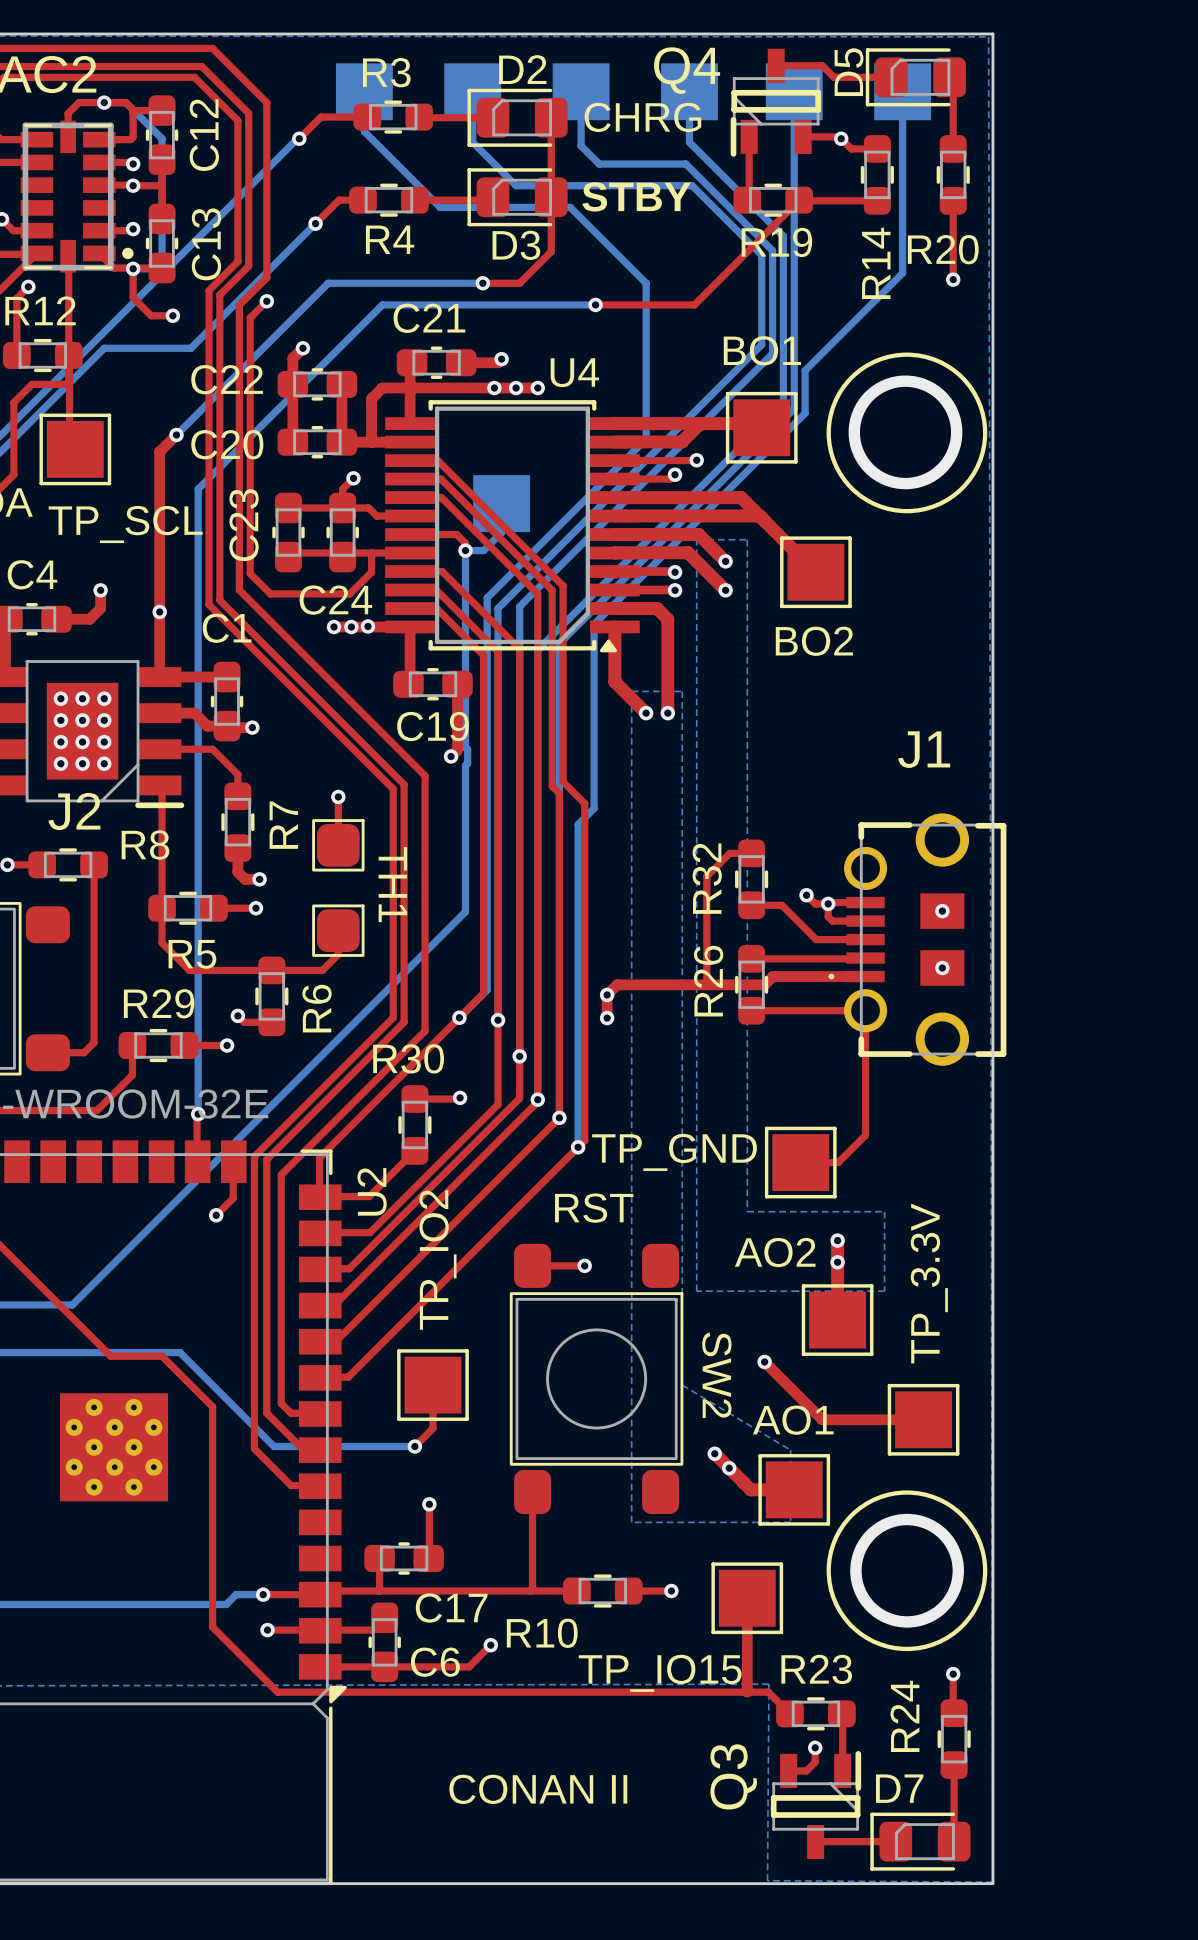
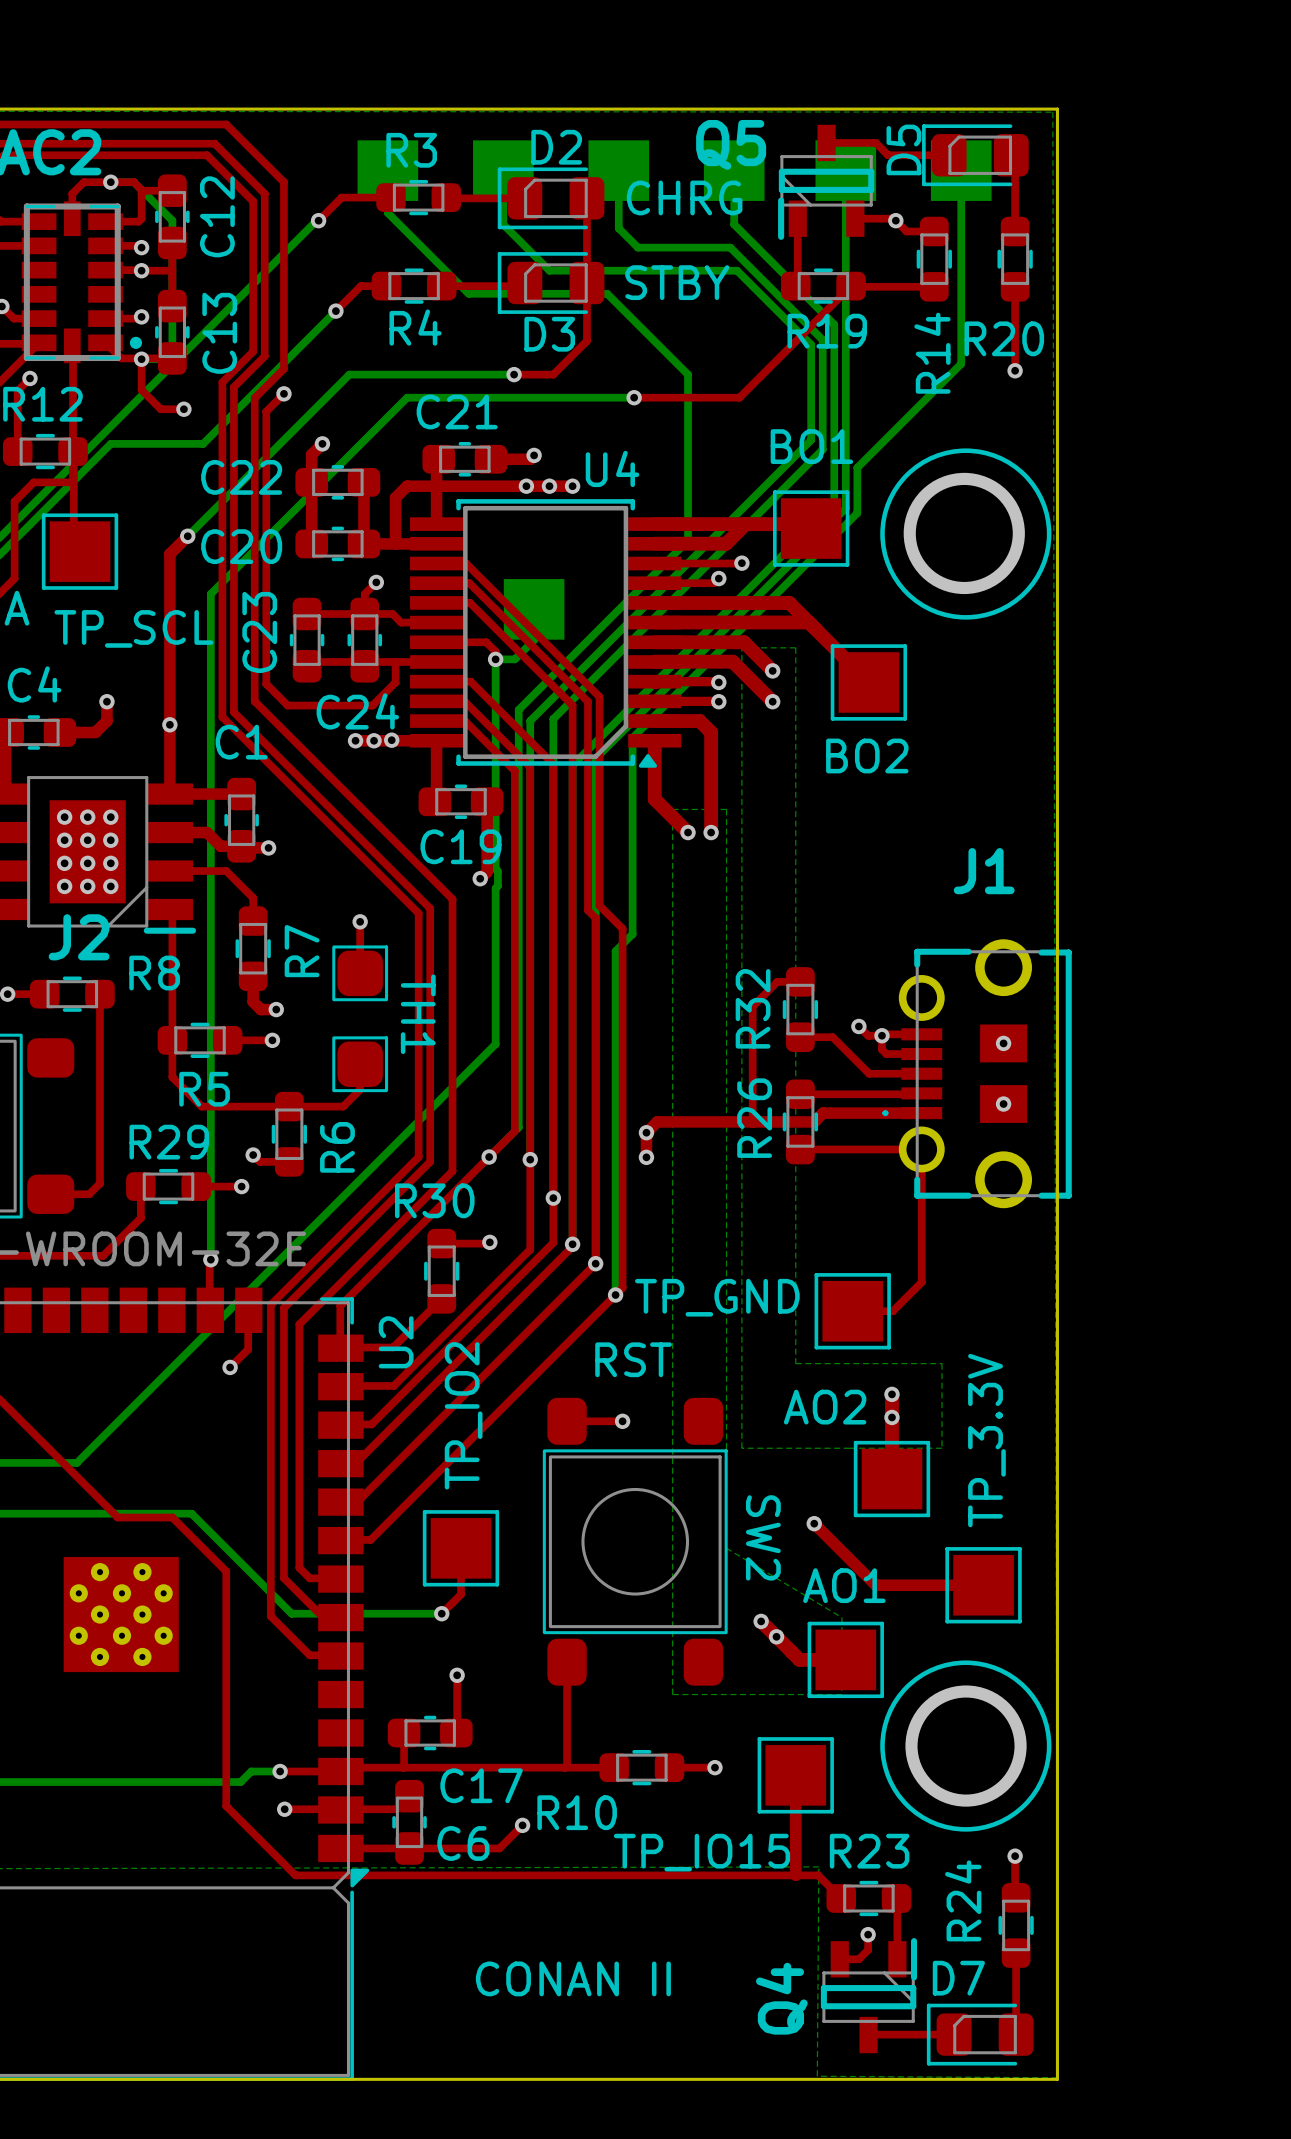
Q4 name: Q4 (687, 70) -> Q5 (731, 144)
Q3 name: Q3 (733, 1776) -> Q4 (781, 1998)

